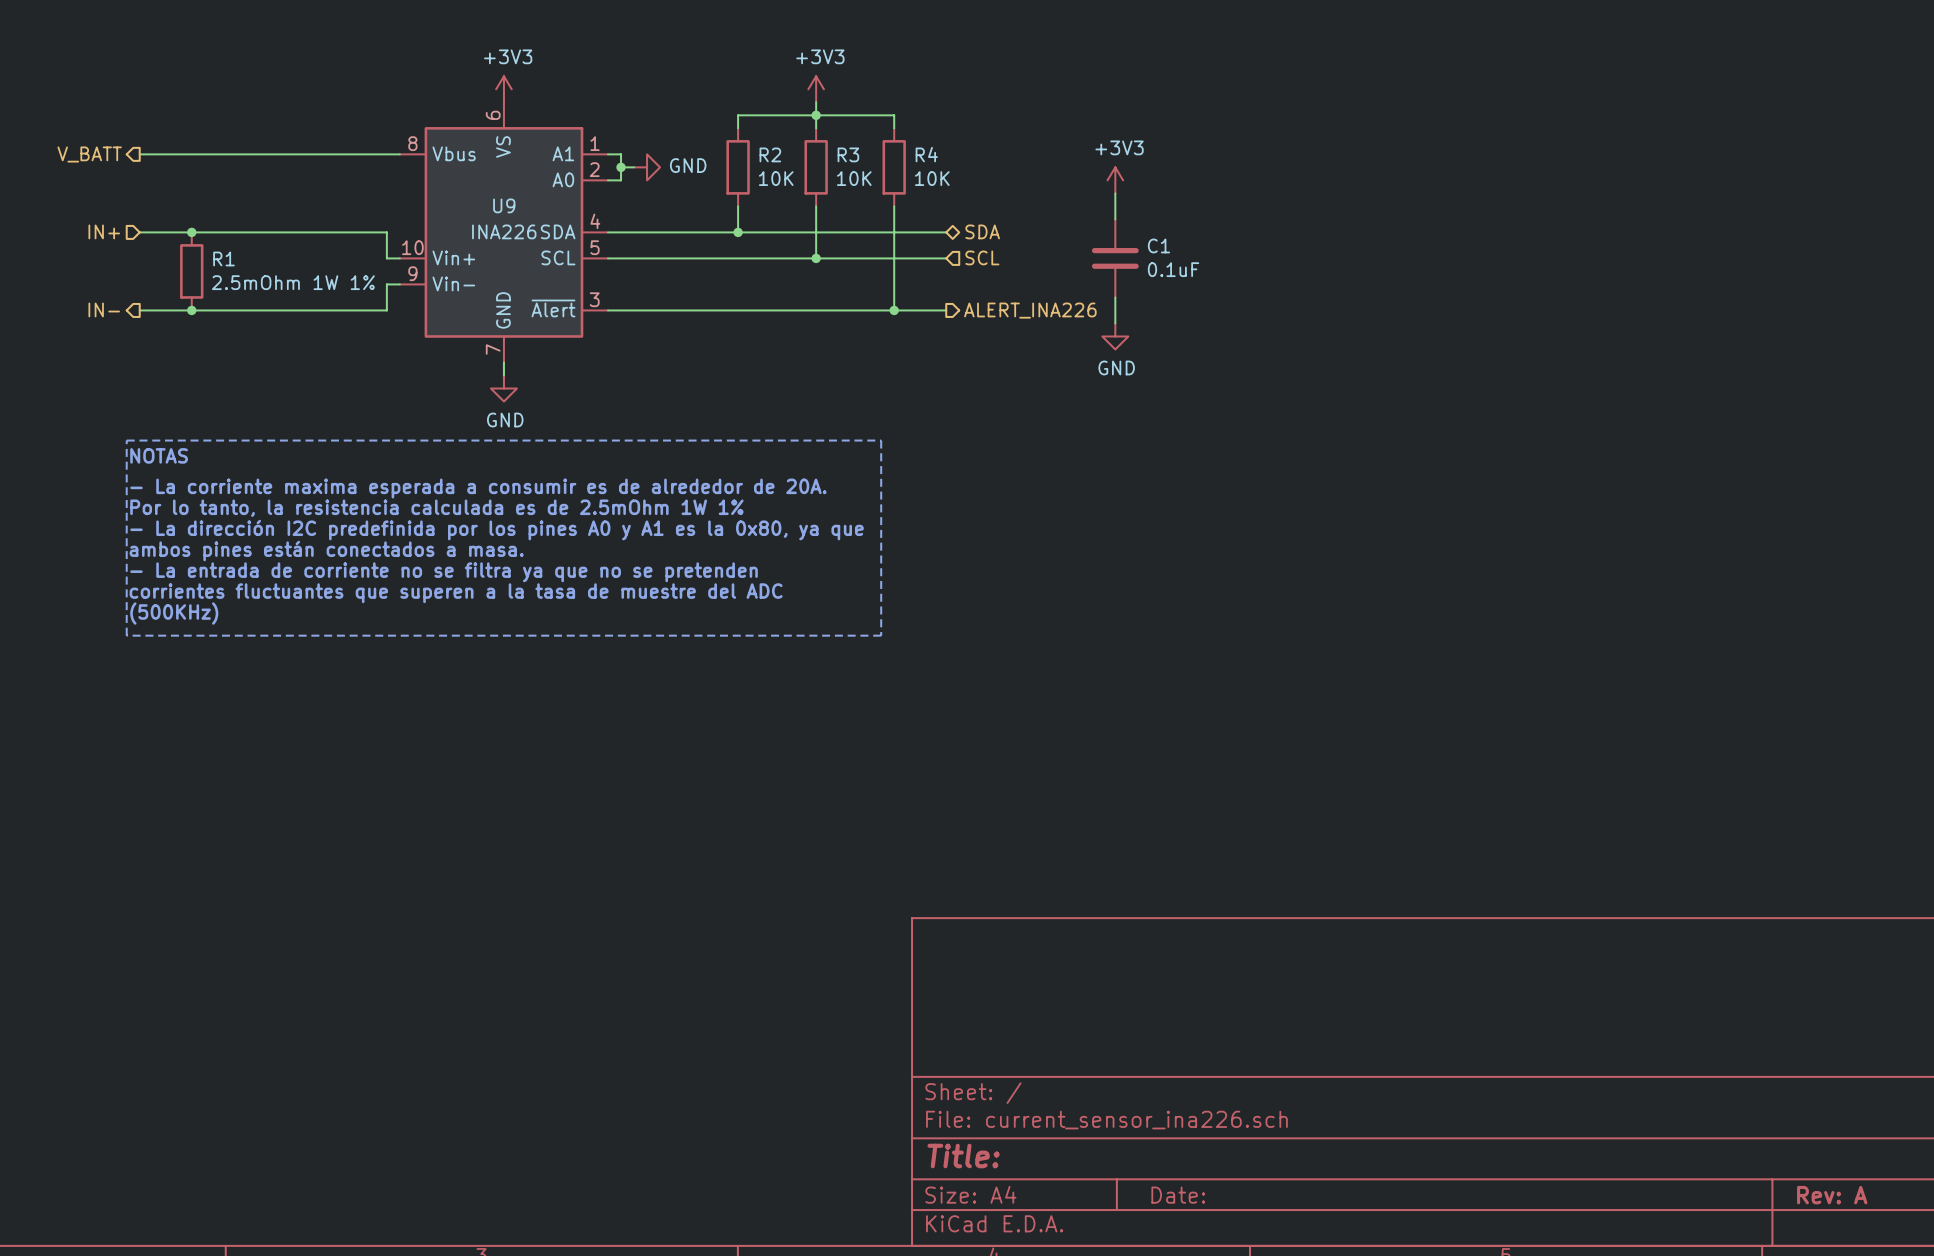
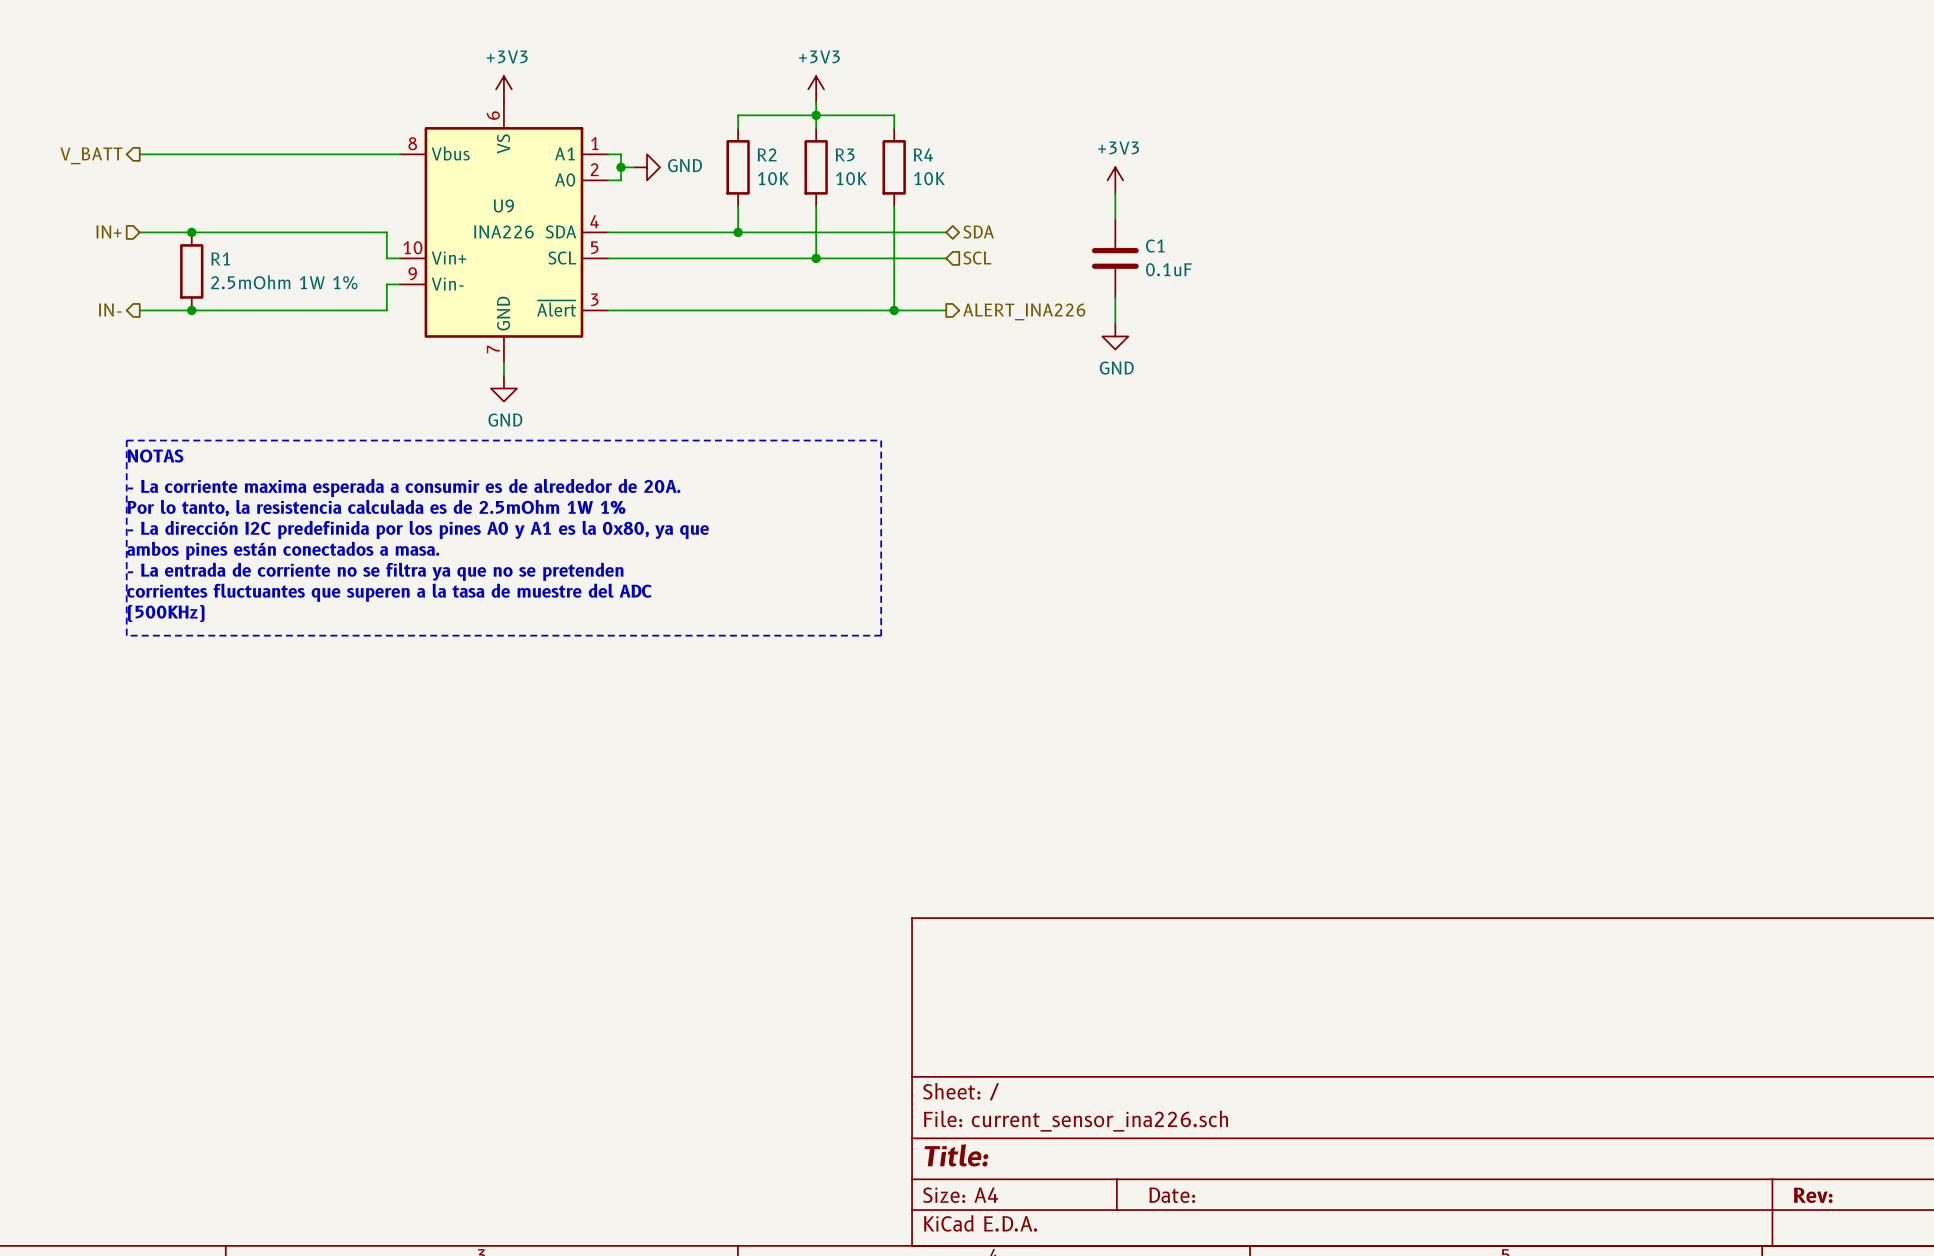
title block: Rev: A (1832, 1195) -> Rev: (1813, 1195)

